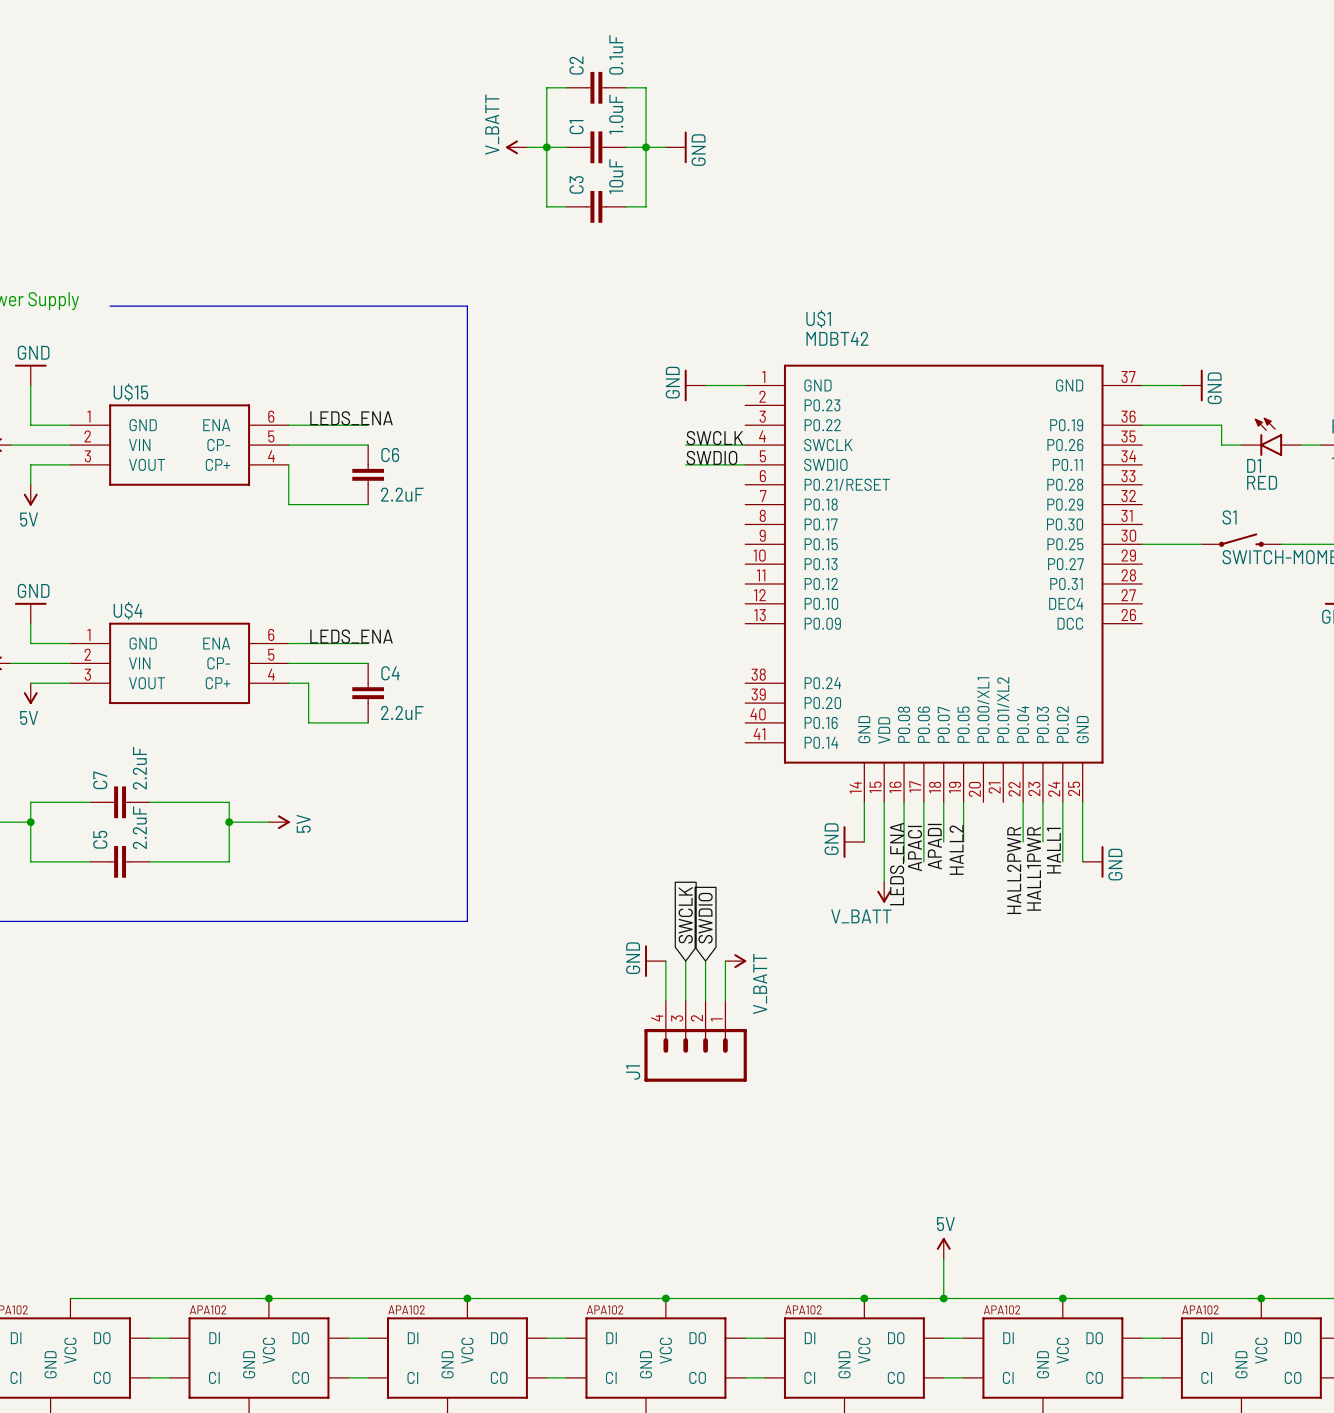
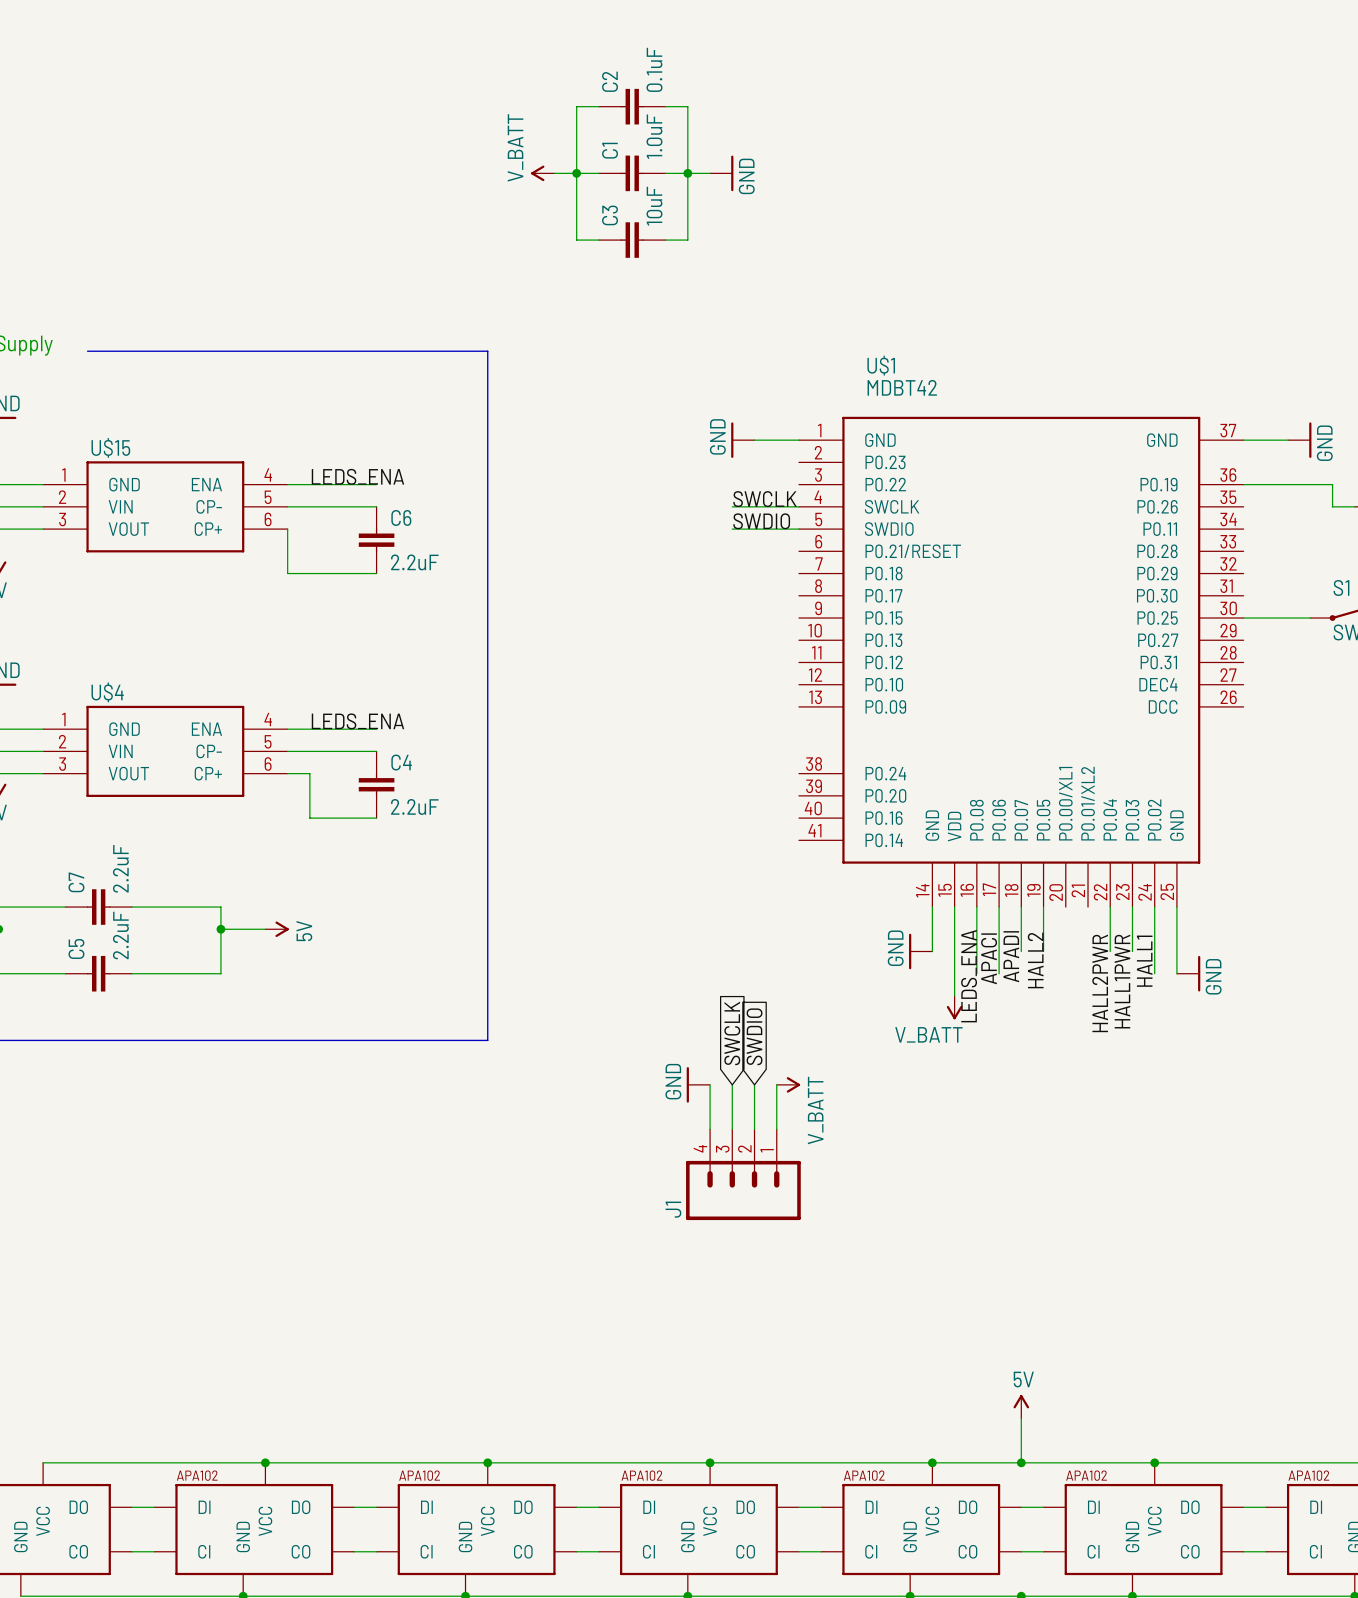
U$15 pin number: 6 (271, 416) -> 4 (268, 474)
U$15 pin number: 4 (271, 456) -> 6 (268, 519)
U$4 pin number: 6 (271, 634) -> 4 (268, 719)
U$4 pin number: 4 (271, 674) -> 6 (268, 764)

